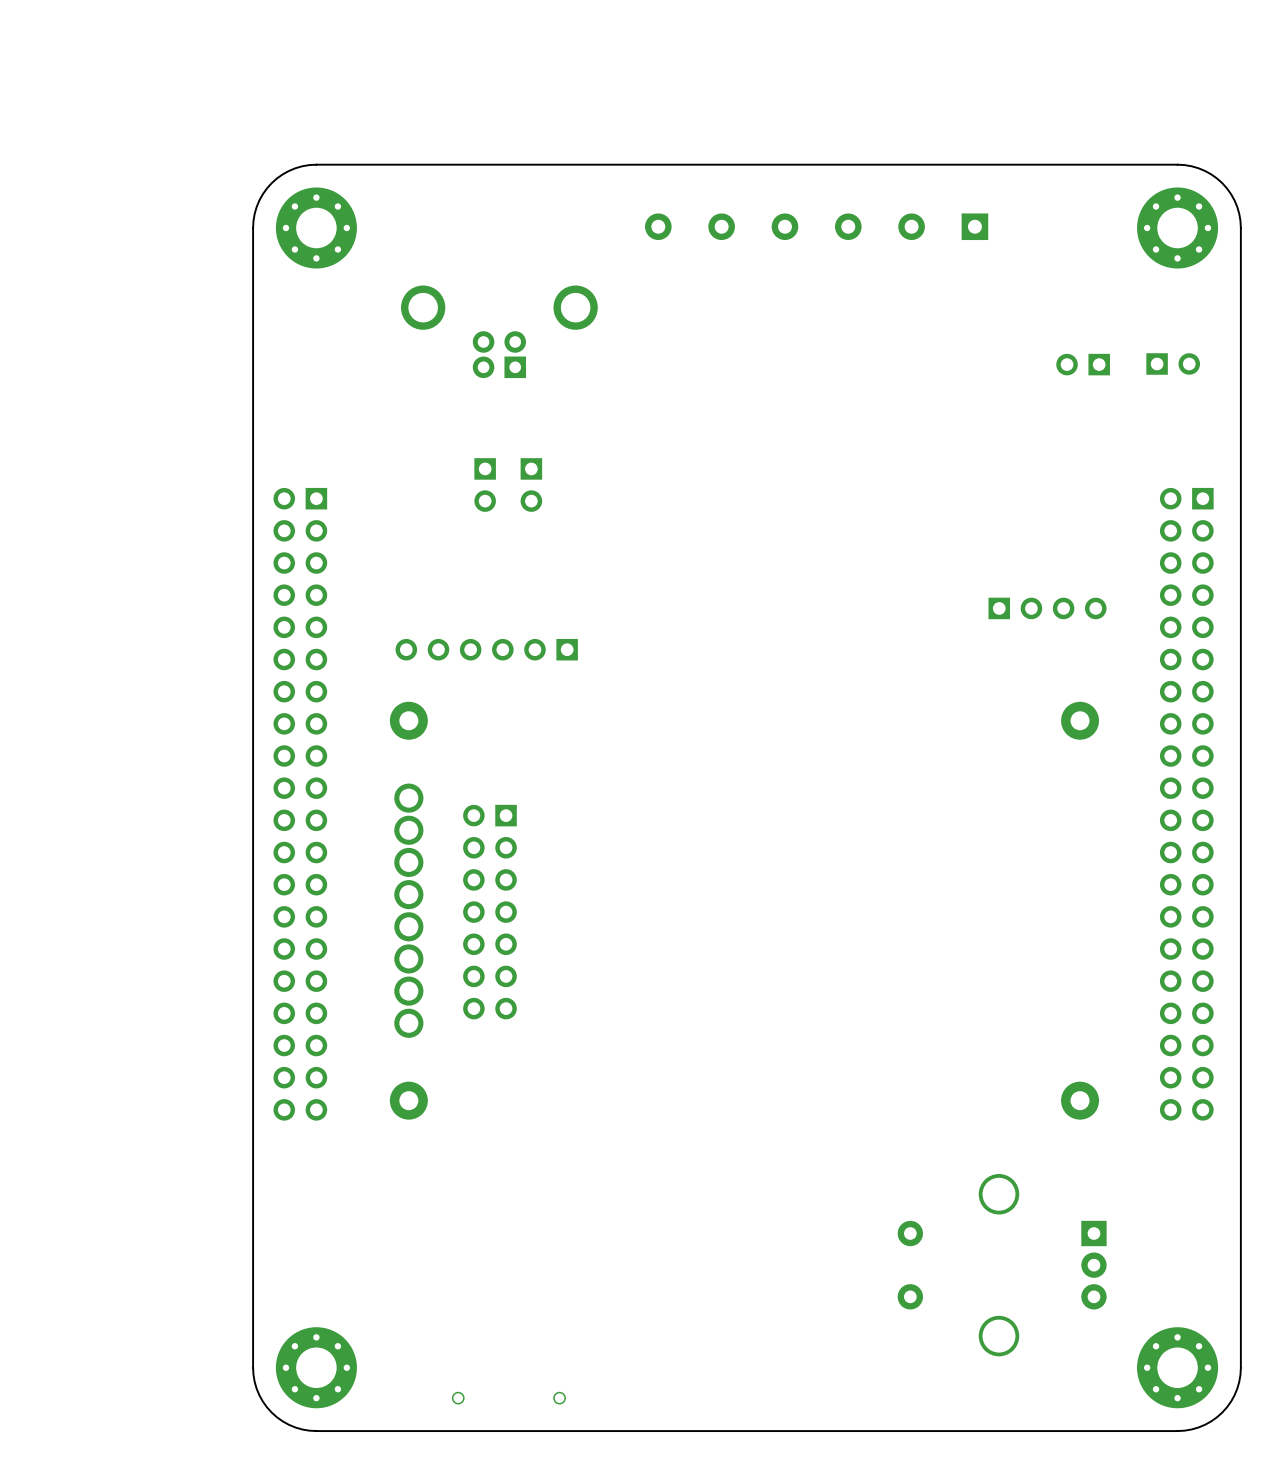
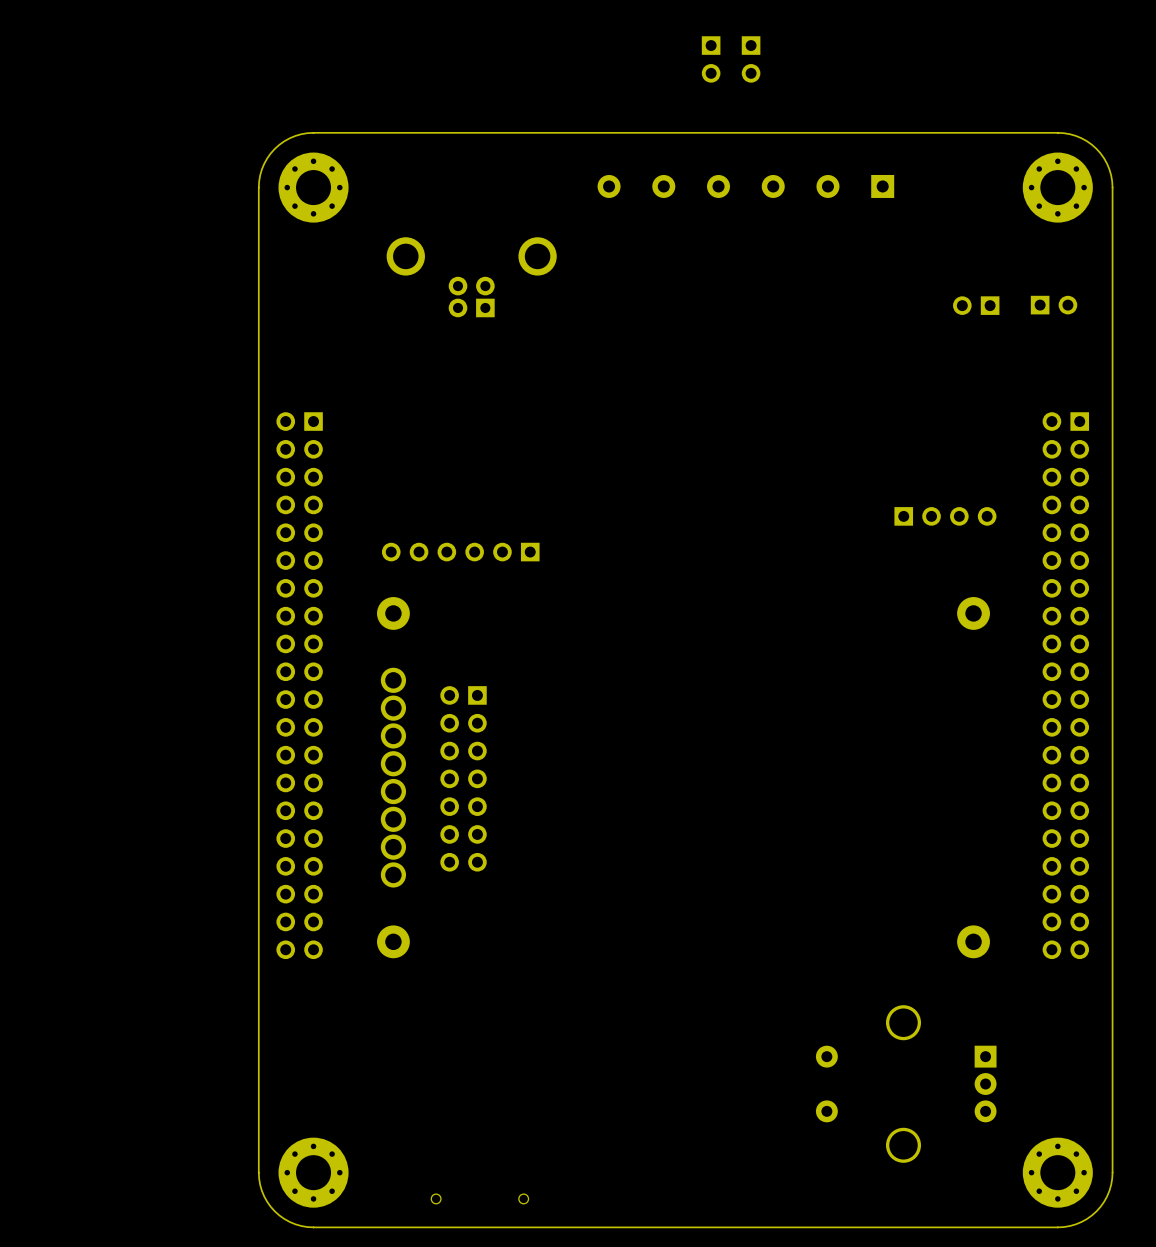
part: none -> (711, 59)
part: none -> (751, 59)
part: (485, 485) -> none
part: (531, 485) -> none

